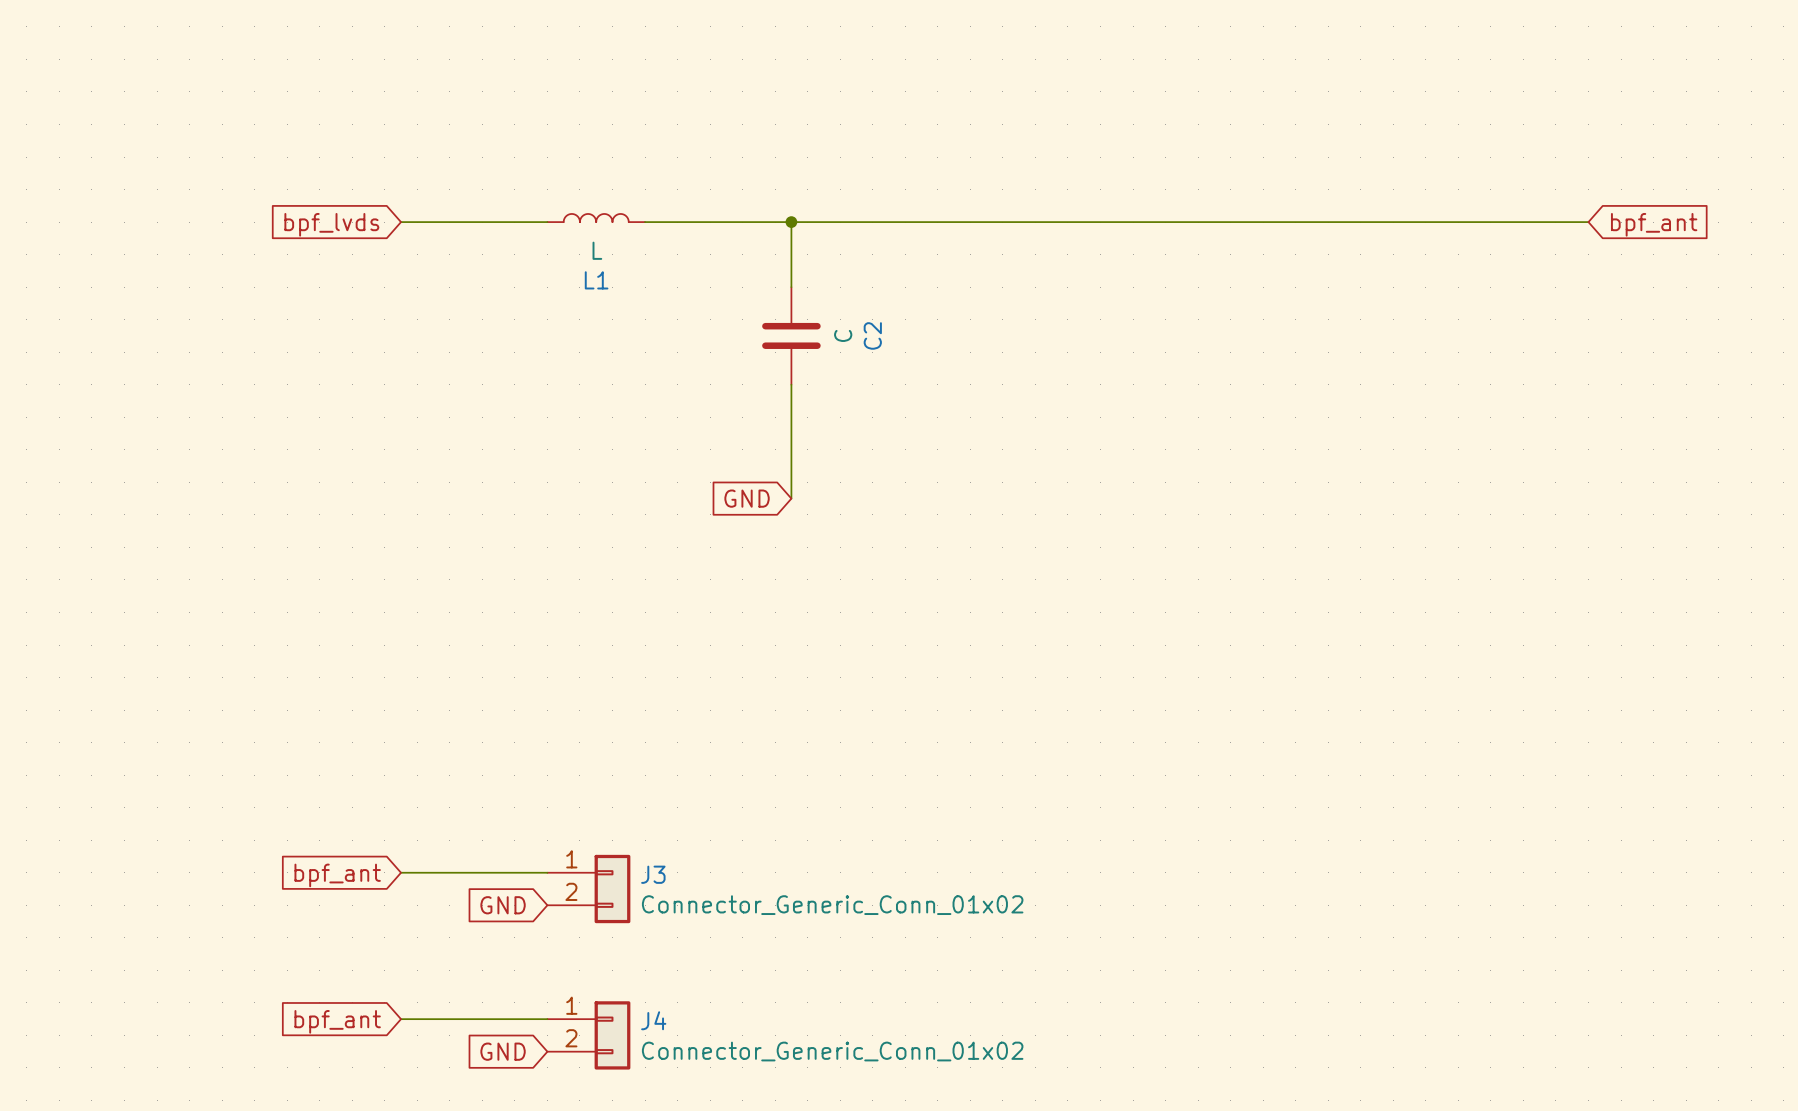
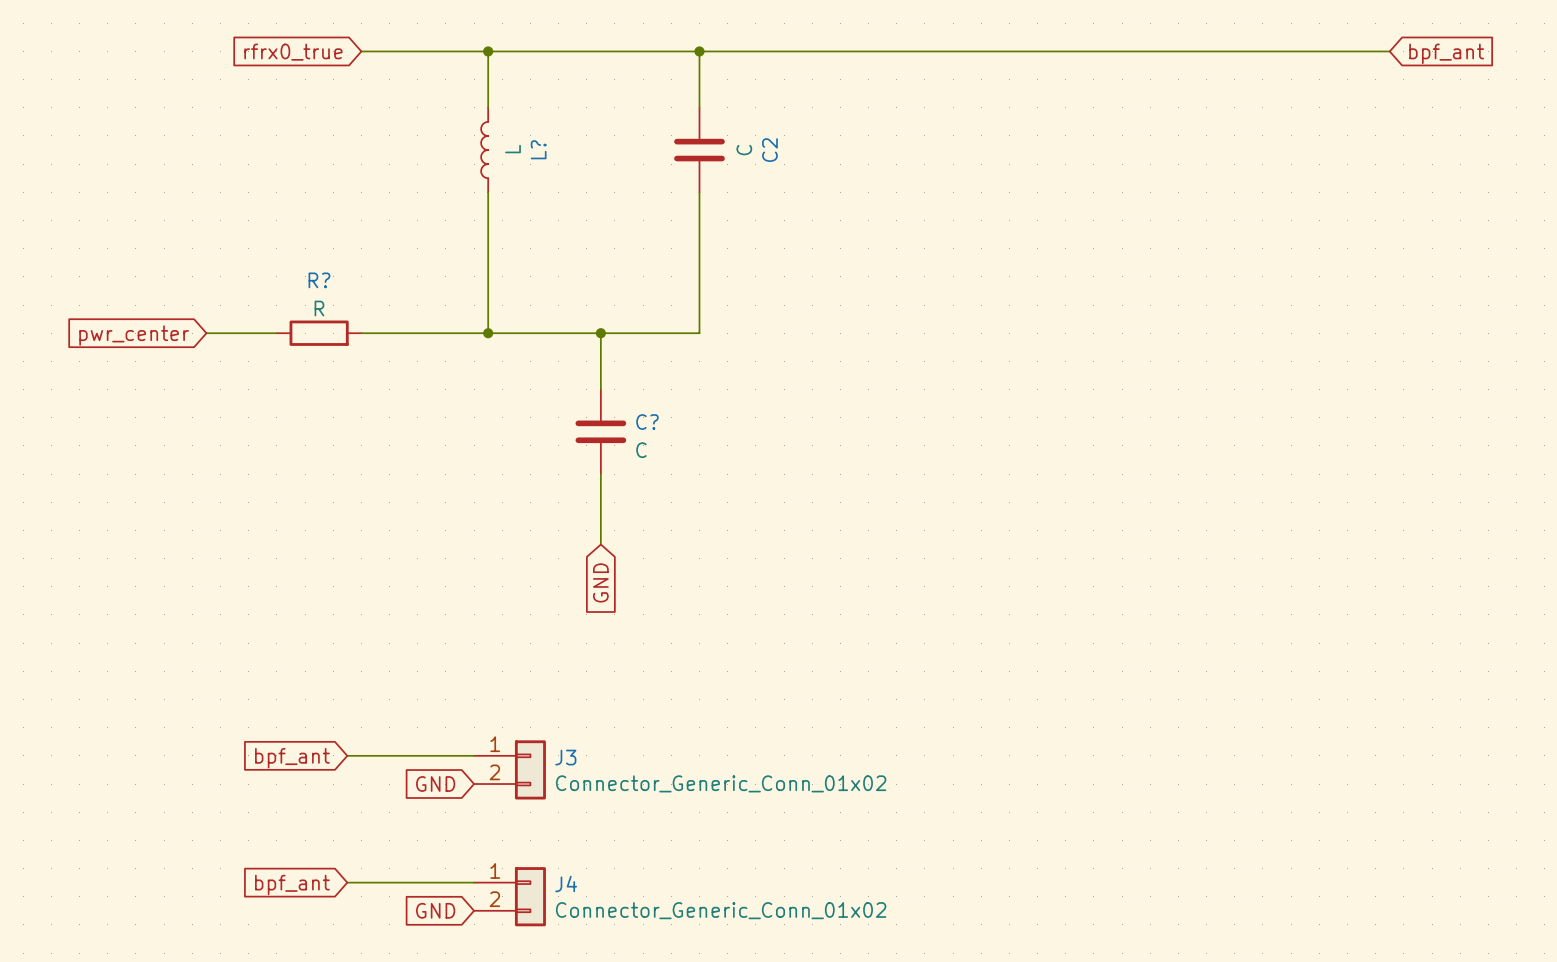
wire: none -> (361, 51) (1389, 51)
wire: none -> (488, 51) (488, 107)
junction: none -> (488, 51)
junction: none -> (699, 51)
global label: none -> rfrx0_true (293, 52)
L?: none -> L (484, 150)
L1: L (596, 218) -> none
wire: (401, 222) (547, 222) -> none
wire: none -> (488, 192) (488, 333)
wire: (645, 222) (1588, 222) -> none
wire: (791, 222) (791, 287) -> (699, 51) (699, 107)
junction: (791, 222) -> none
wire: none -> (699, 192) (699, 333) (361, 333)
global label: bpf_lvds (331, 224) -> none
global label position: bpf_ant (1654, 224) -> bpf_ant (1446, 53)
C2 position: (791, 335) -> (699, 150)
wire: none -> (206, 333) (276, 333)
R?: none -> R (319, 333)
junction: none -> (488, 333)
wire: none -> (600, 333) (600, 389)
junction: none -> (600, 333)
wire: (791, 384) (791, 498) -> none
global label: none -> pwr_center (134, 335)
C?: none -> C (600, 431)
global label rotation: 0° (747, 498) -> 90° counterclockwise (600, 582)
global label position: GND (747, 498) -> GND (600, 582)
wire: none -> (600, 474) (600, 544)

